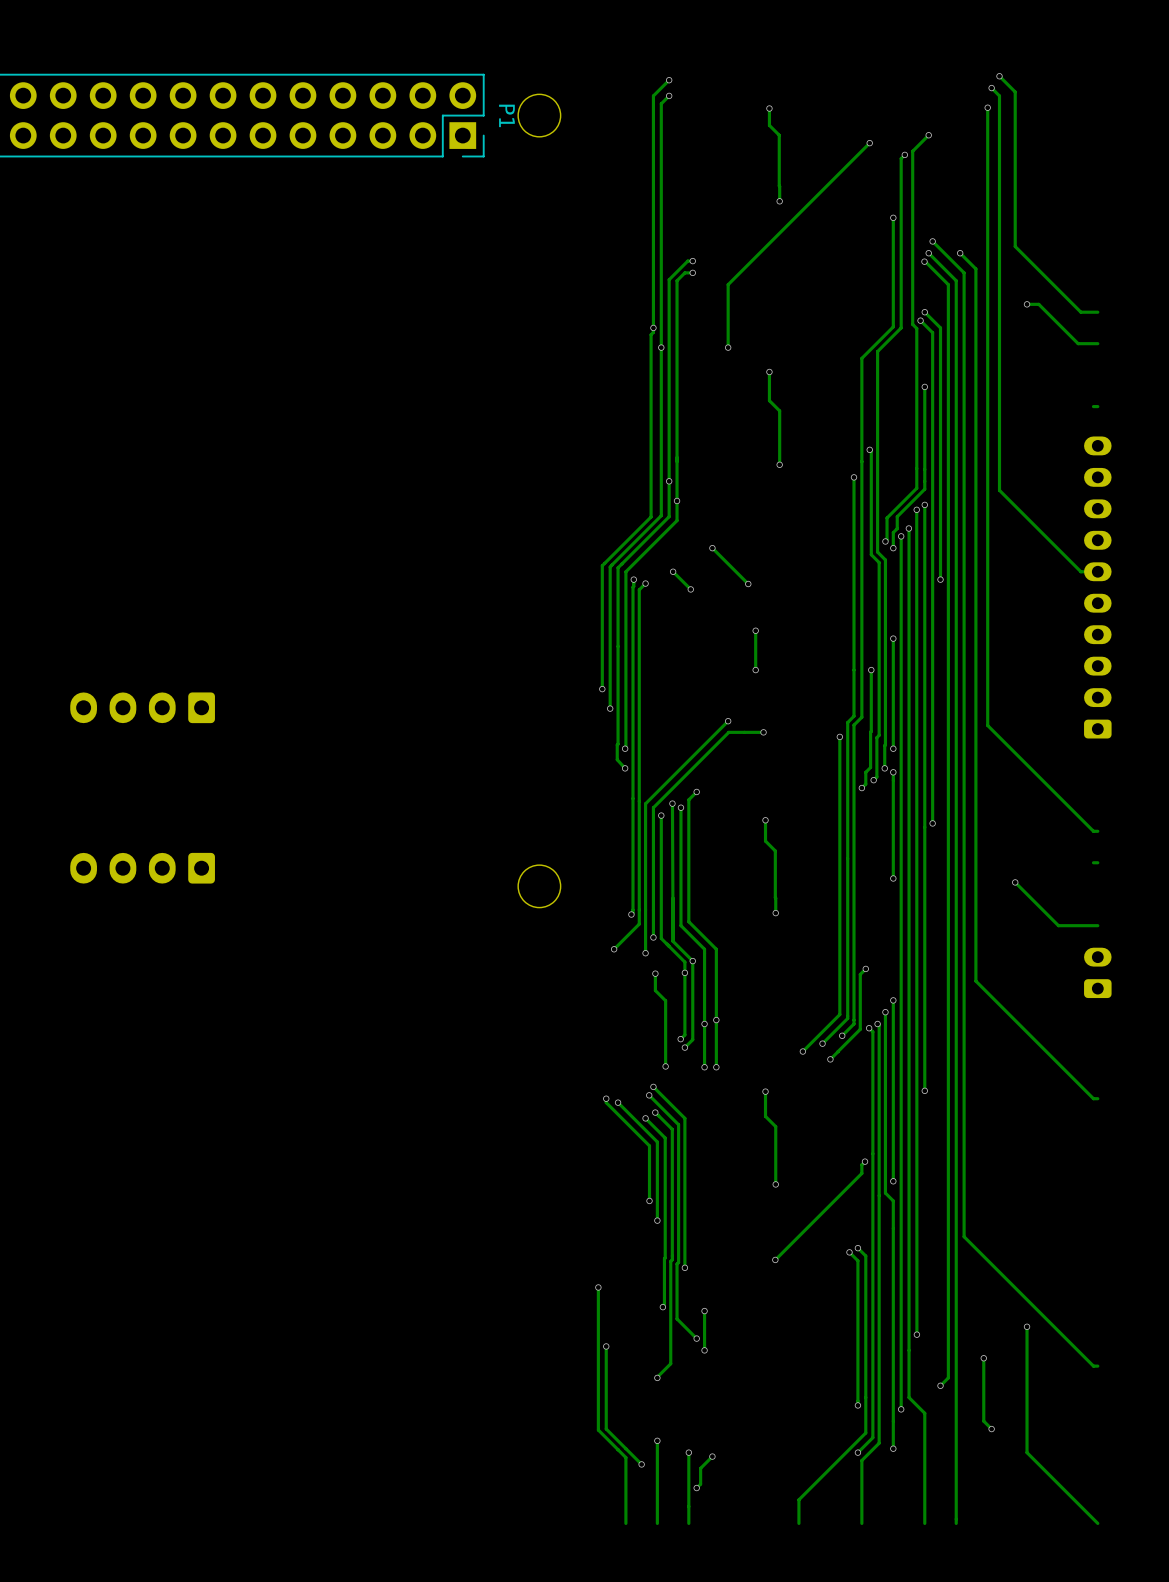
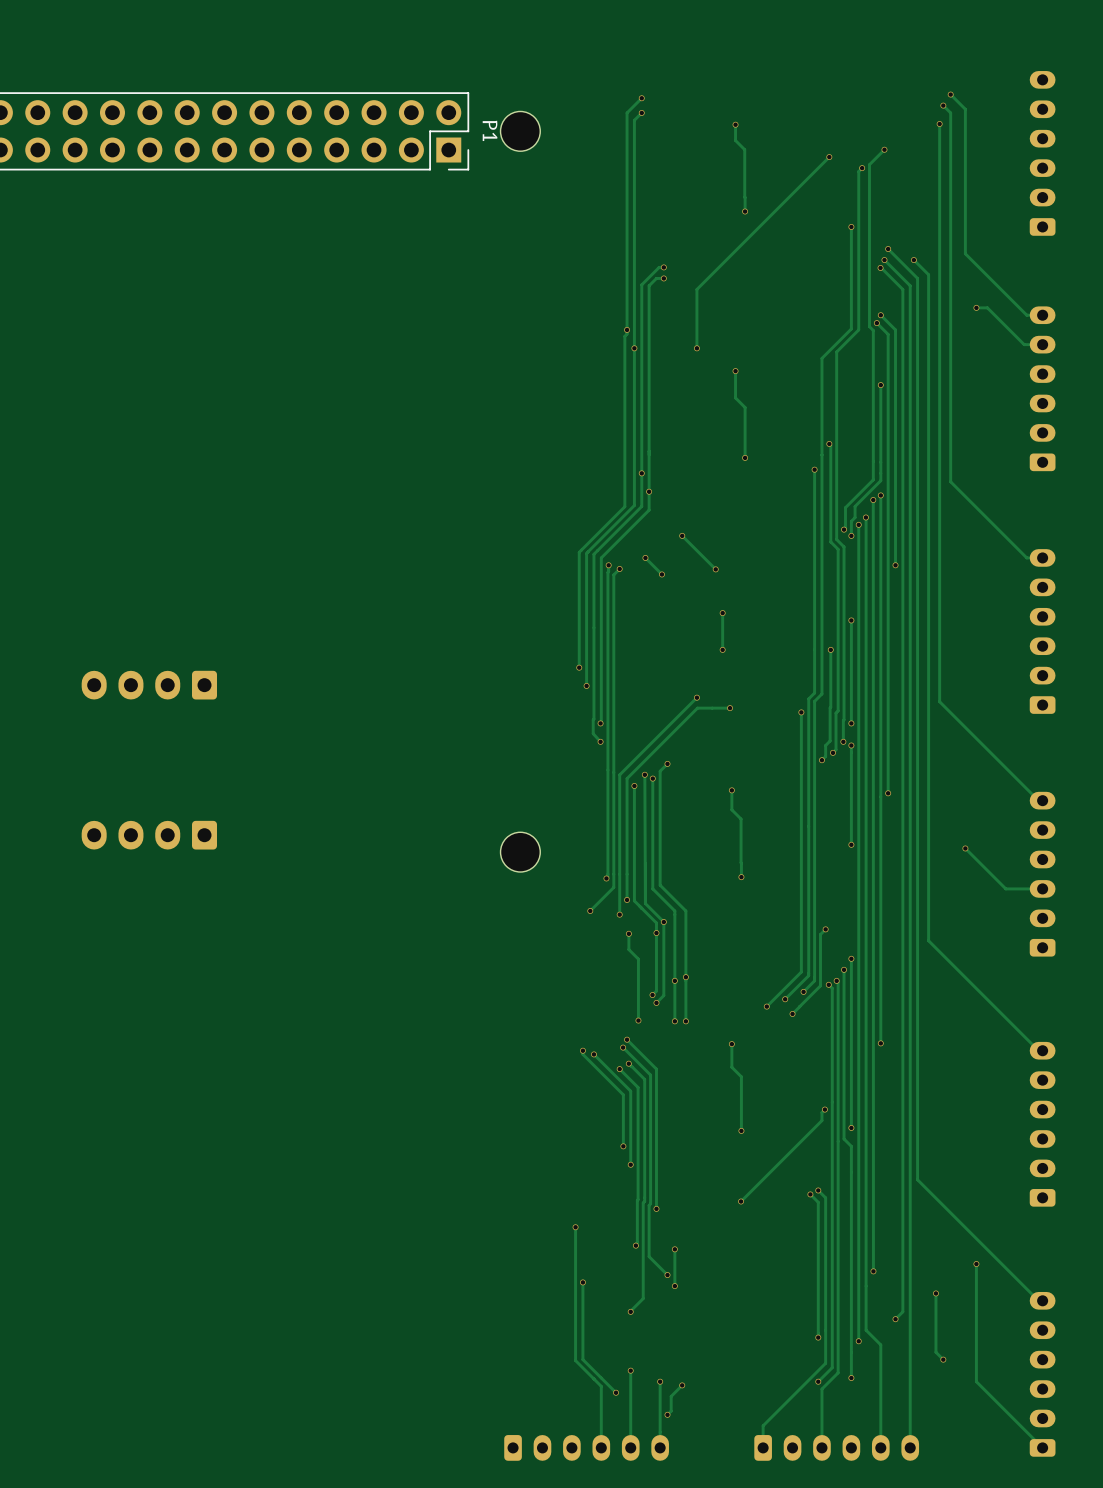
part: none -> (1042, 153)
part: none -> (1042, 388)
part: (1097, 587) -> none
part: none -> (1042, 874)
part: none -> (1042, 1124)
part: none -> (1042, 1374)
part: none -> (586, 1447)
part: none -> (836, 1447)

